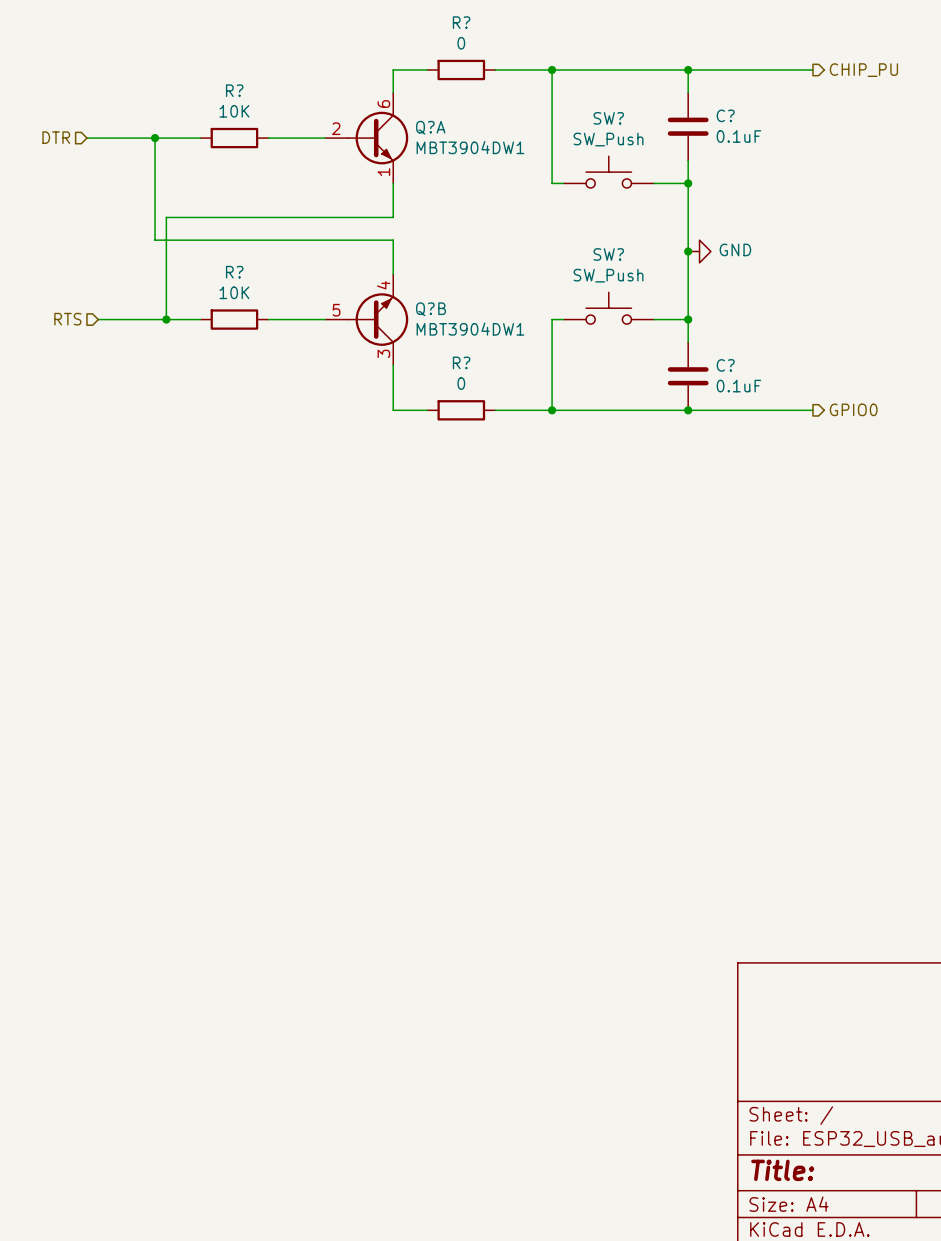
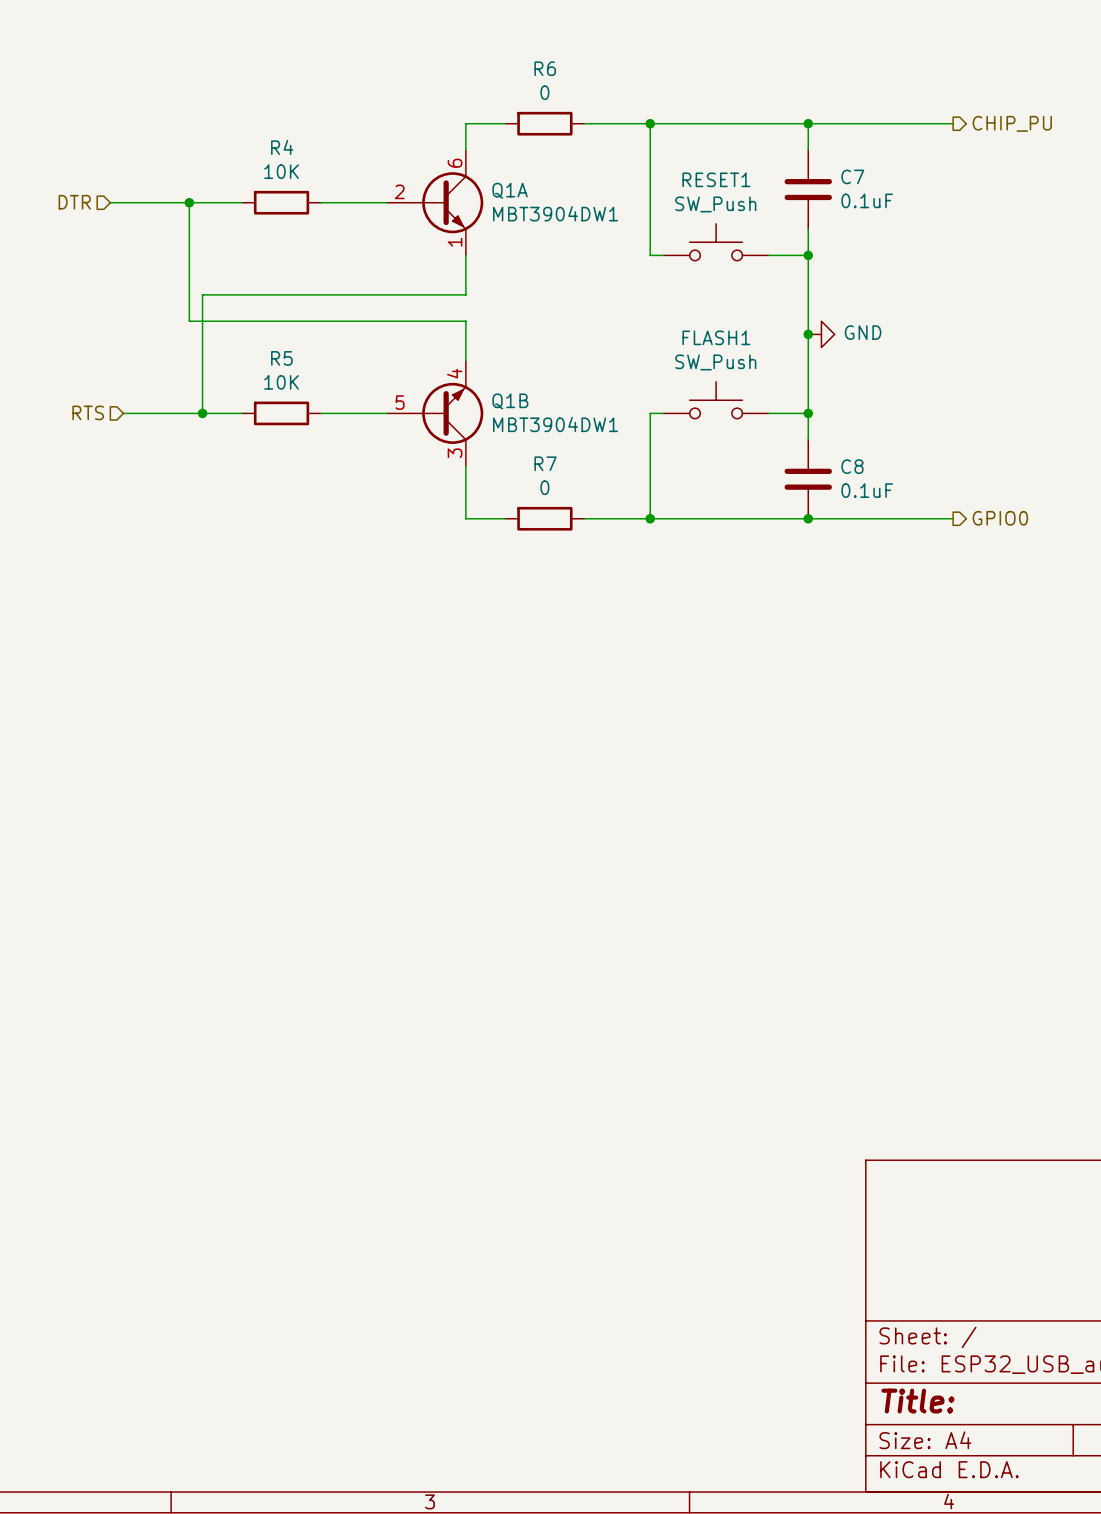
R? name: R? (461, 22) -> R6 (545, 68)
R? name: R? (234, 90) -> R4 (282, 147)
C? name: C? (725, 115) -> C7 (852, 176)
SW? name: SW? (608, 118) -> RESET1 (716, 179)
Q?A name: Q?A (430, 127) -> Q1A (510, 190)
SW? name: SW? (608, 254) -> FLASH1 (716, 337)
R? name: R? (234, 272) -> R5 (281, 358)
Q?B name: Q?B (431, 309) -> Q1B (510, 401)
R? name: R? (461, 362) -> R7 (545, 463)
C? name: C? (725, 365) -> C8 (852, 466)

